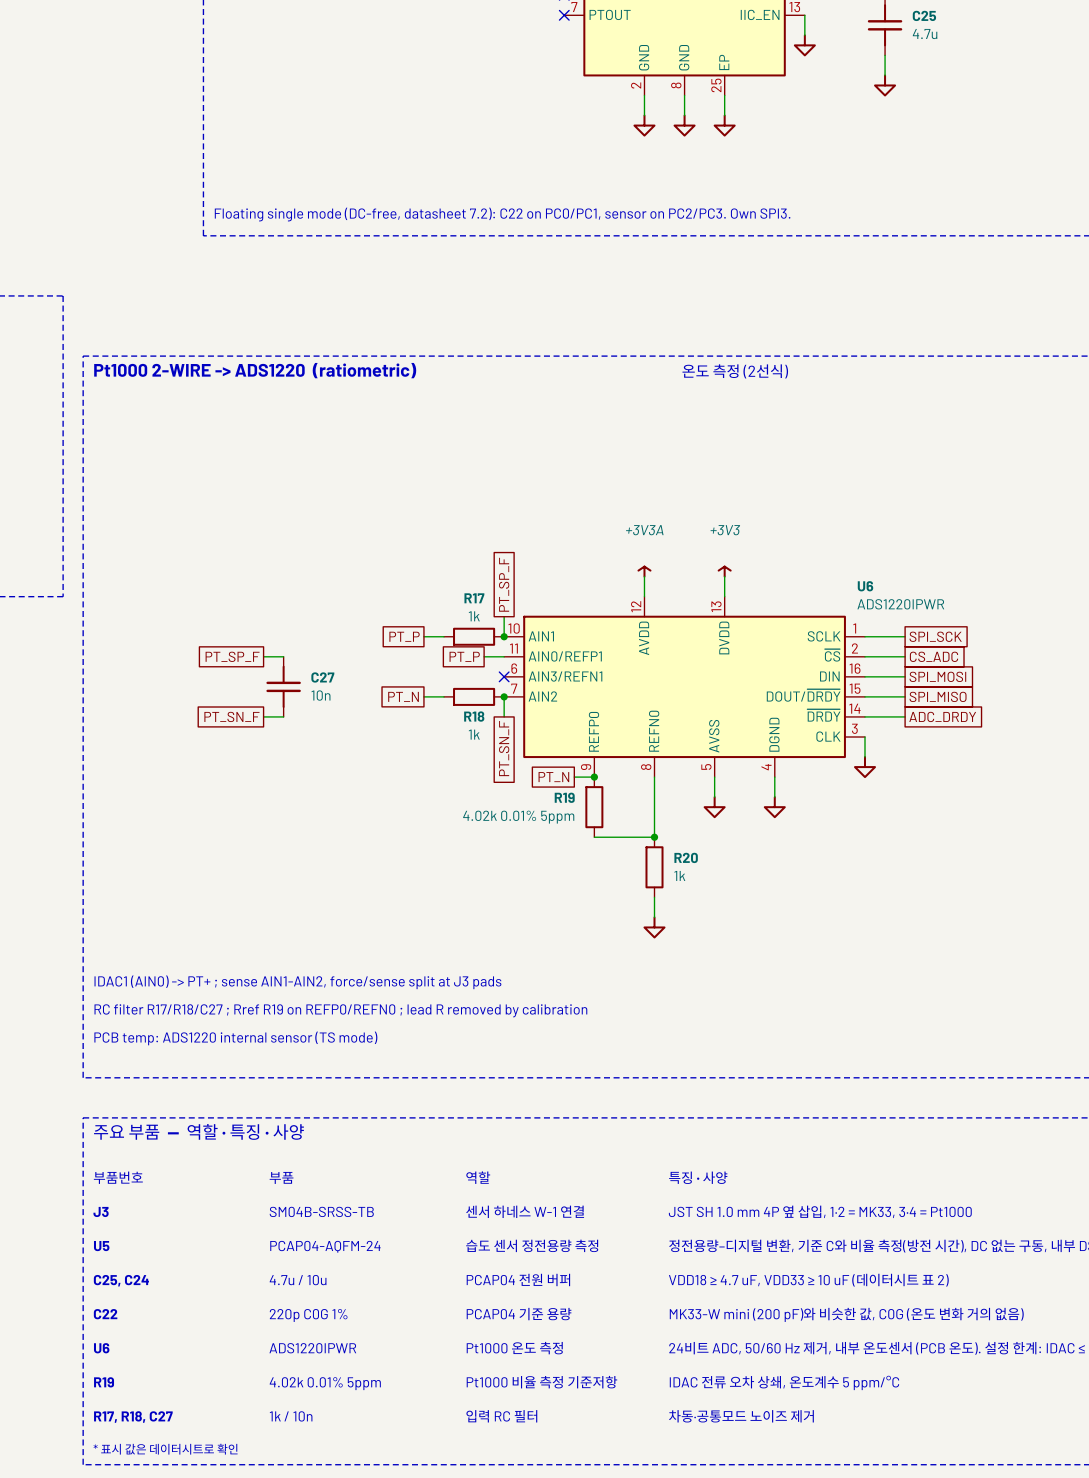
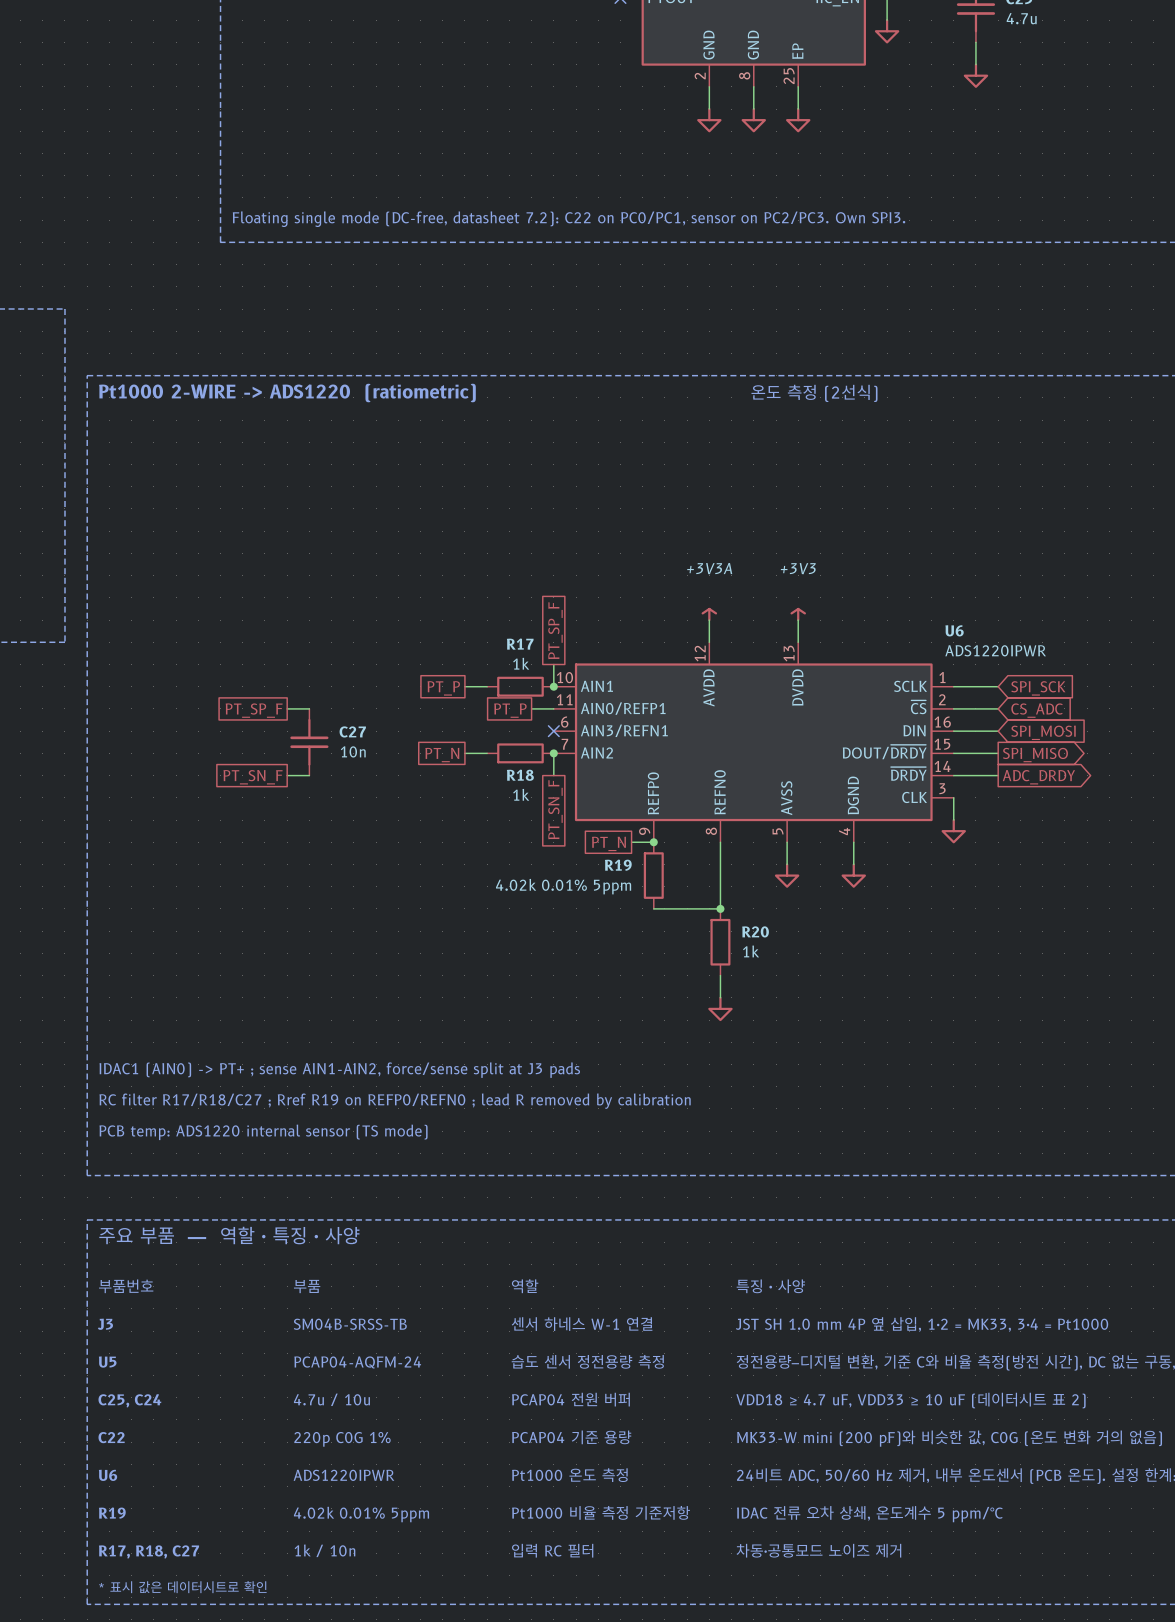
global label shape: passive (935, 636) -> input (1038, 688)
global label shape: passive (934, 656) -> input (1037, 710)
global label shape: passive (937, 676) -> input (1043, 732)
global label shape: passive (938, 696) -> output (1035, 755)
global label shape: passive (942, 716) -> output (1038, 777)

